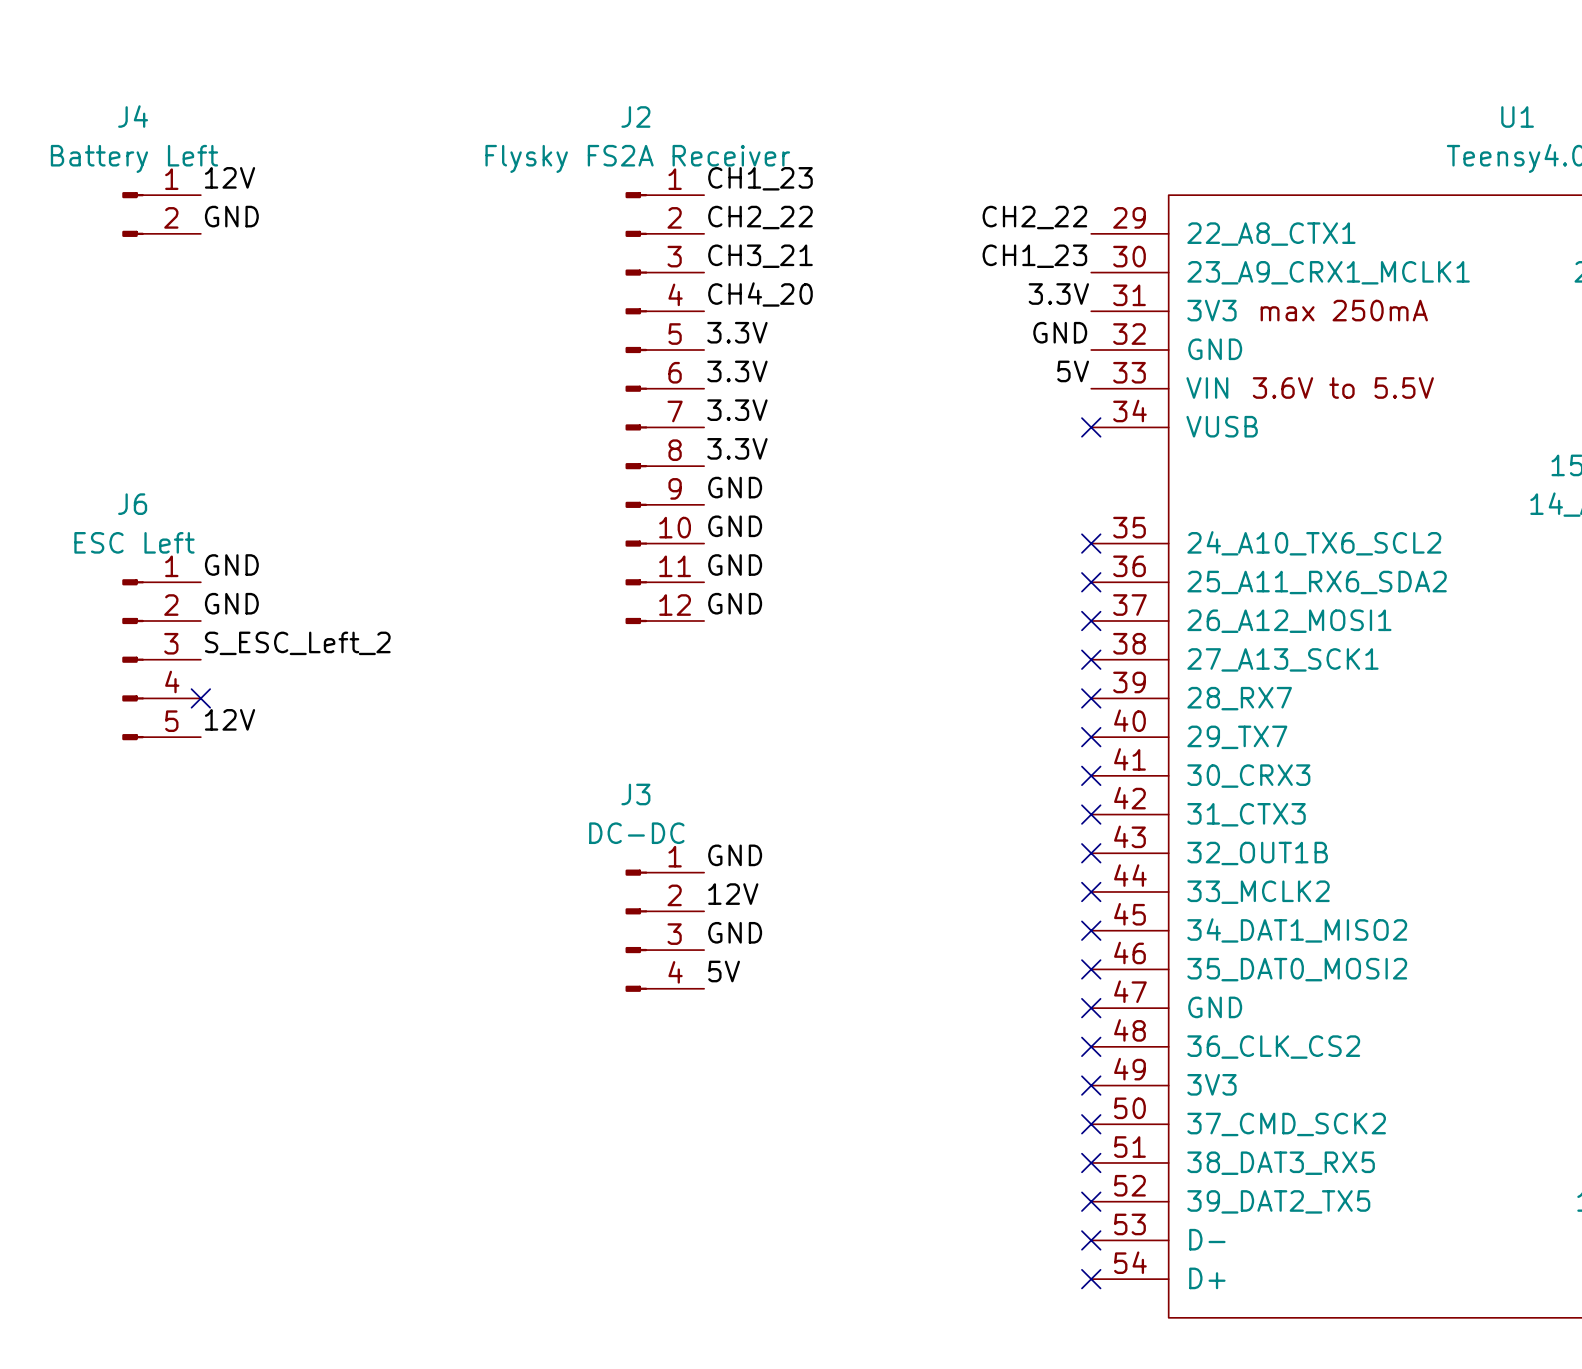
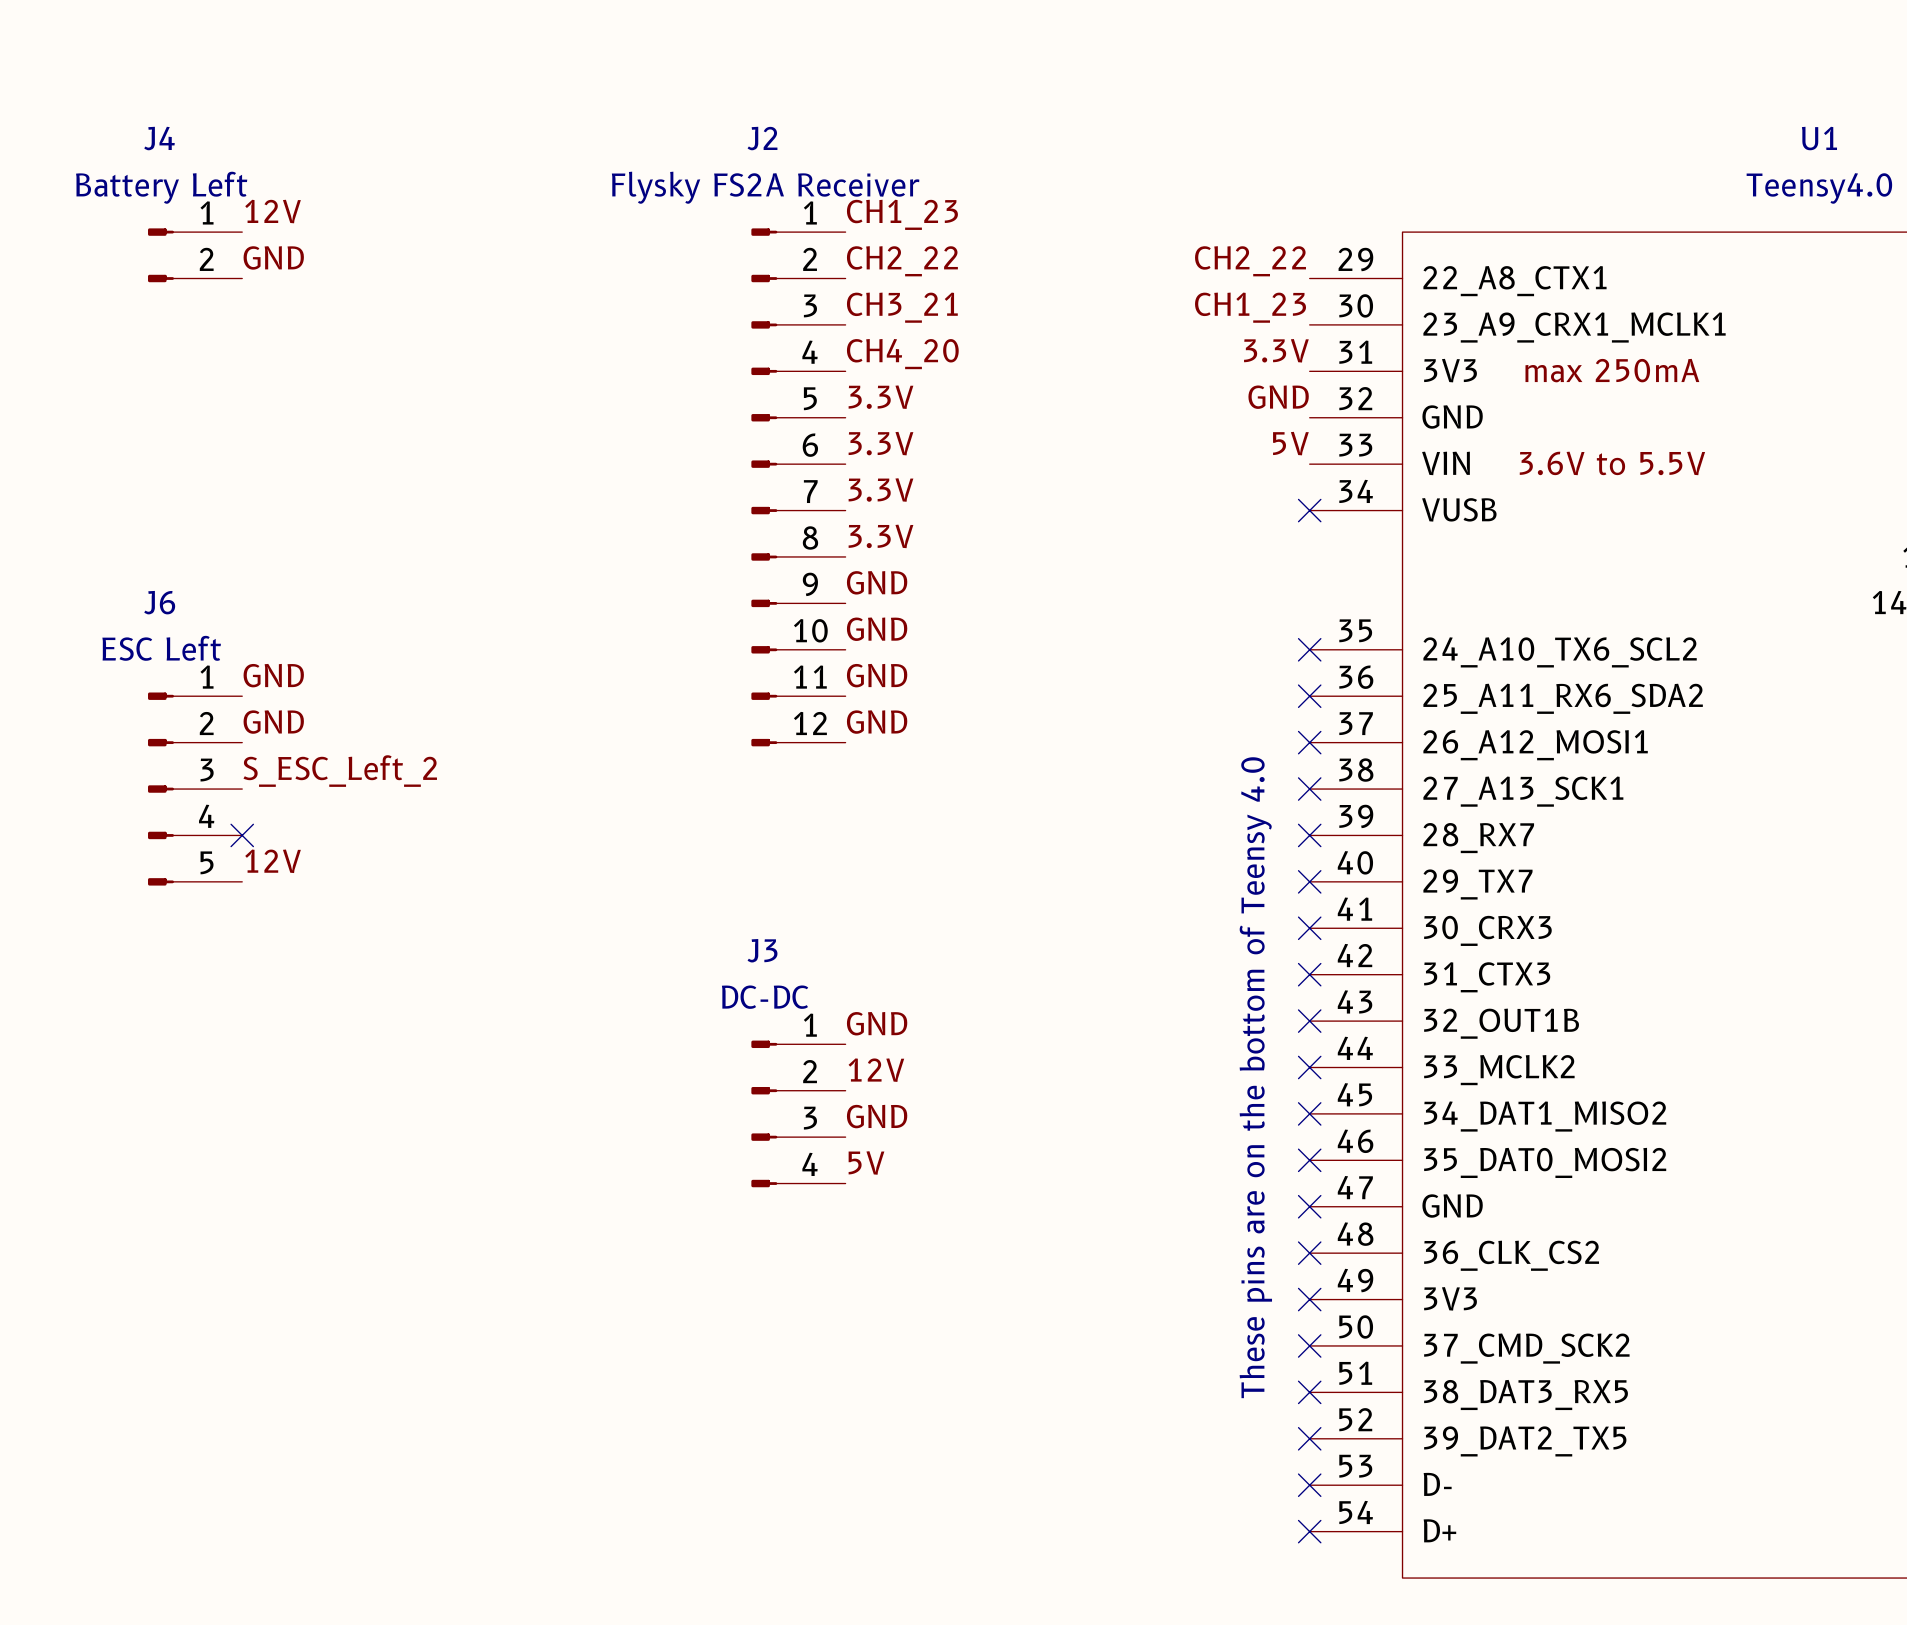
text: none -> These pins are on the bottom of Teensy 4.0 (1255, 1077)

